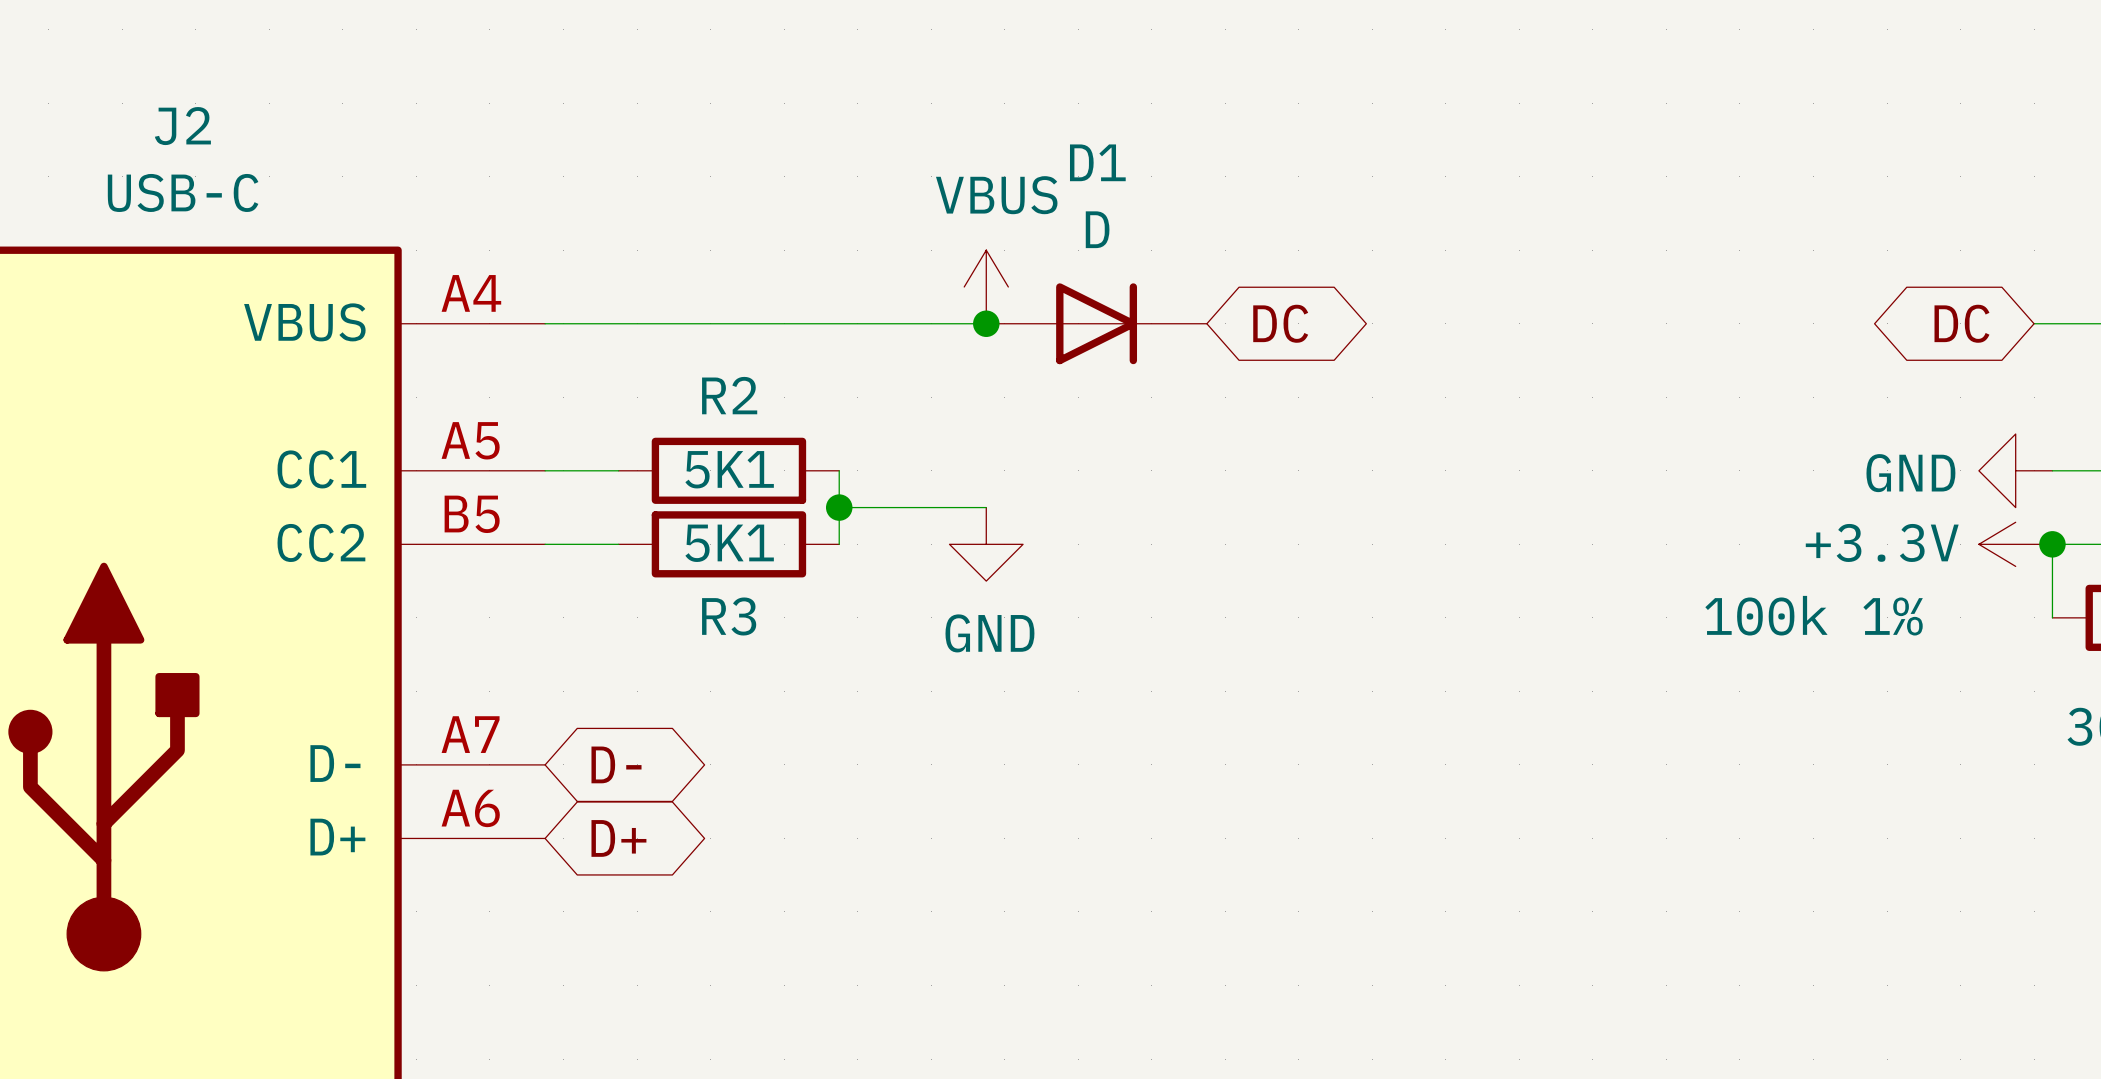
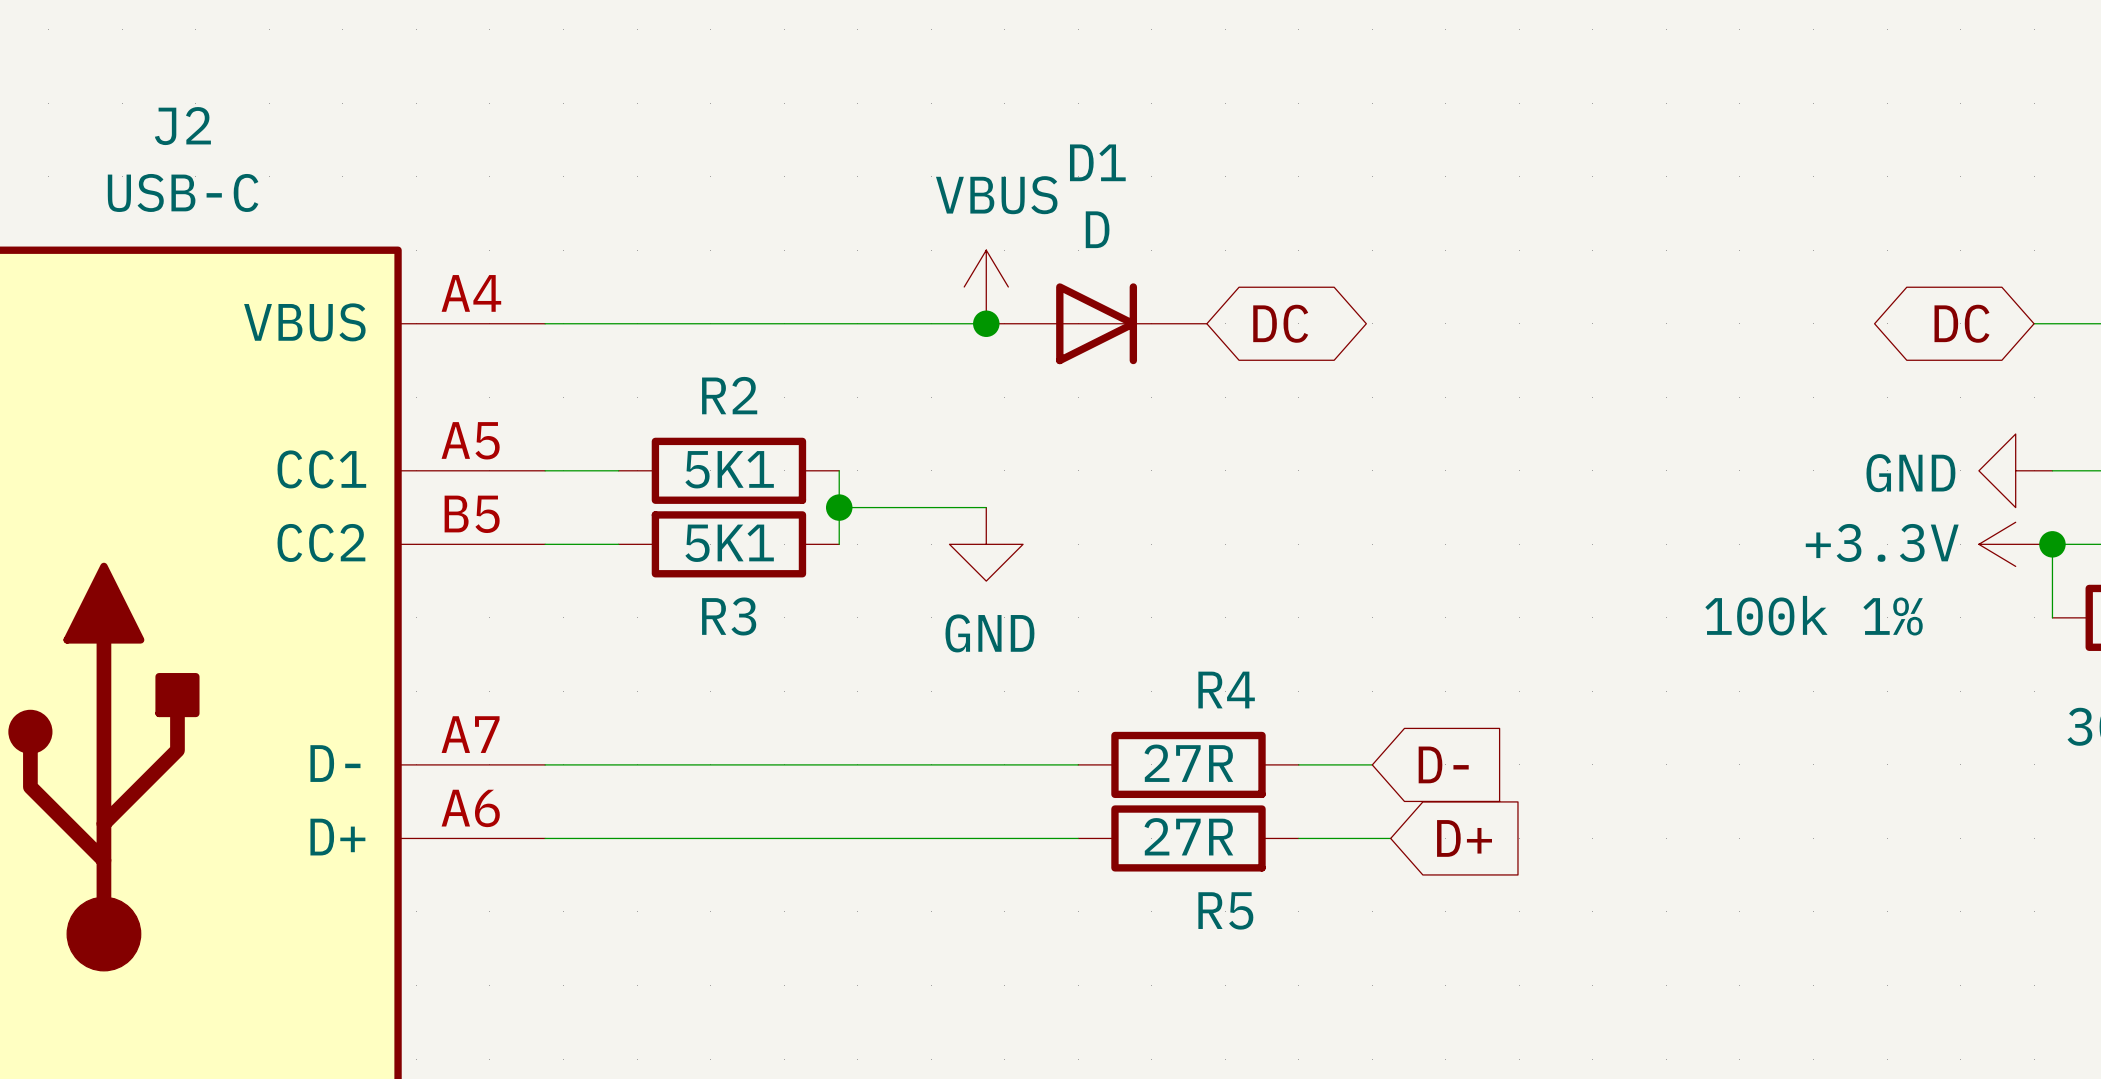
wire: none -> (545, 764) (1078, 764)
global label: D- (616, 764) -> none
R4: none -> 27R (1188, 764)
wire: none -> (1298, 764) (1372, 764)
global label: none -> D- (1443, 764)
wire: none -> (545, 838) (1078, 838)
global label: D+ (618, 838) -> none
R5: none -> 27R (1188, 838)
wire: none -> (1298, 838) (1390, 838)
global label: none -> D+ (1464, 838)

